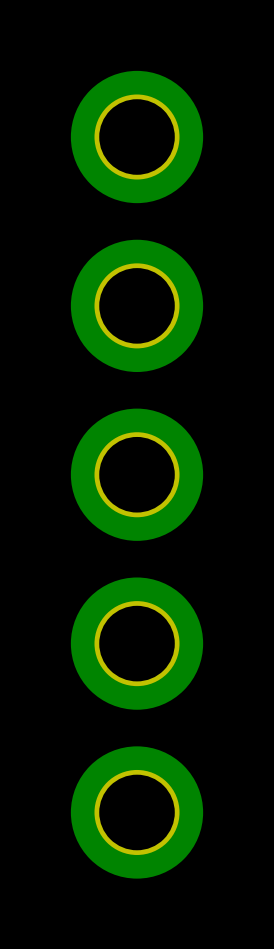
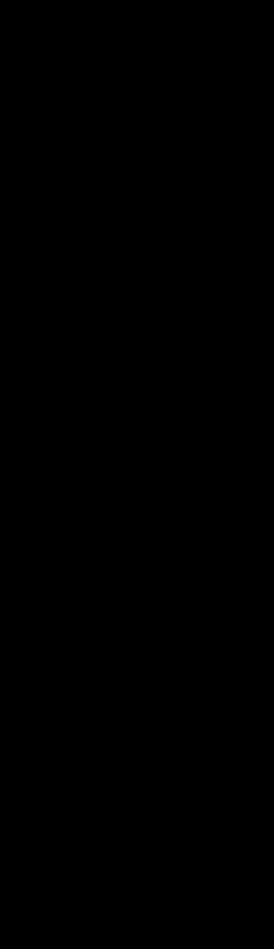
part: (137, 137) -> none
part: (137, 305) -> none
part: (137, 474) -> none
part: (137, 643) -> none
part: (137, 812) -> none

